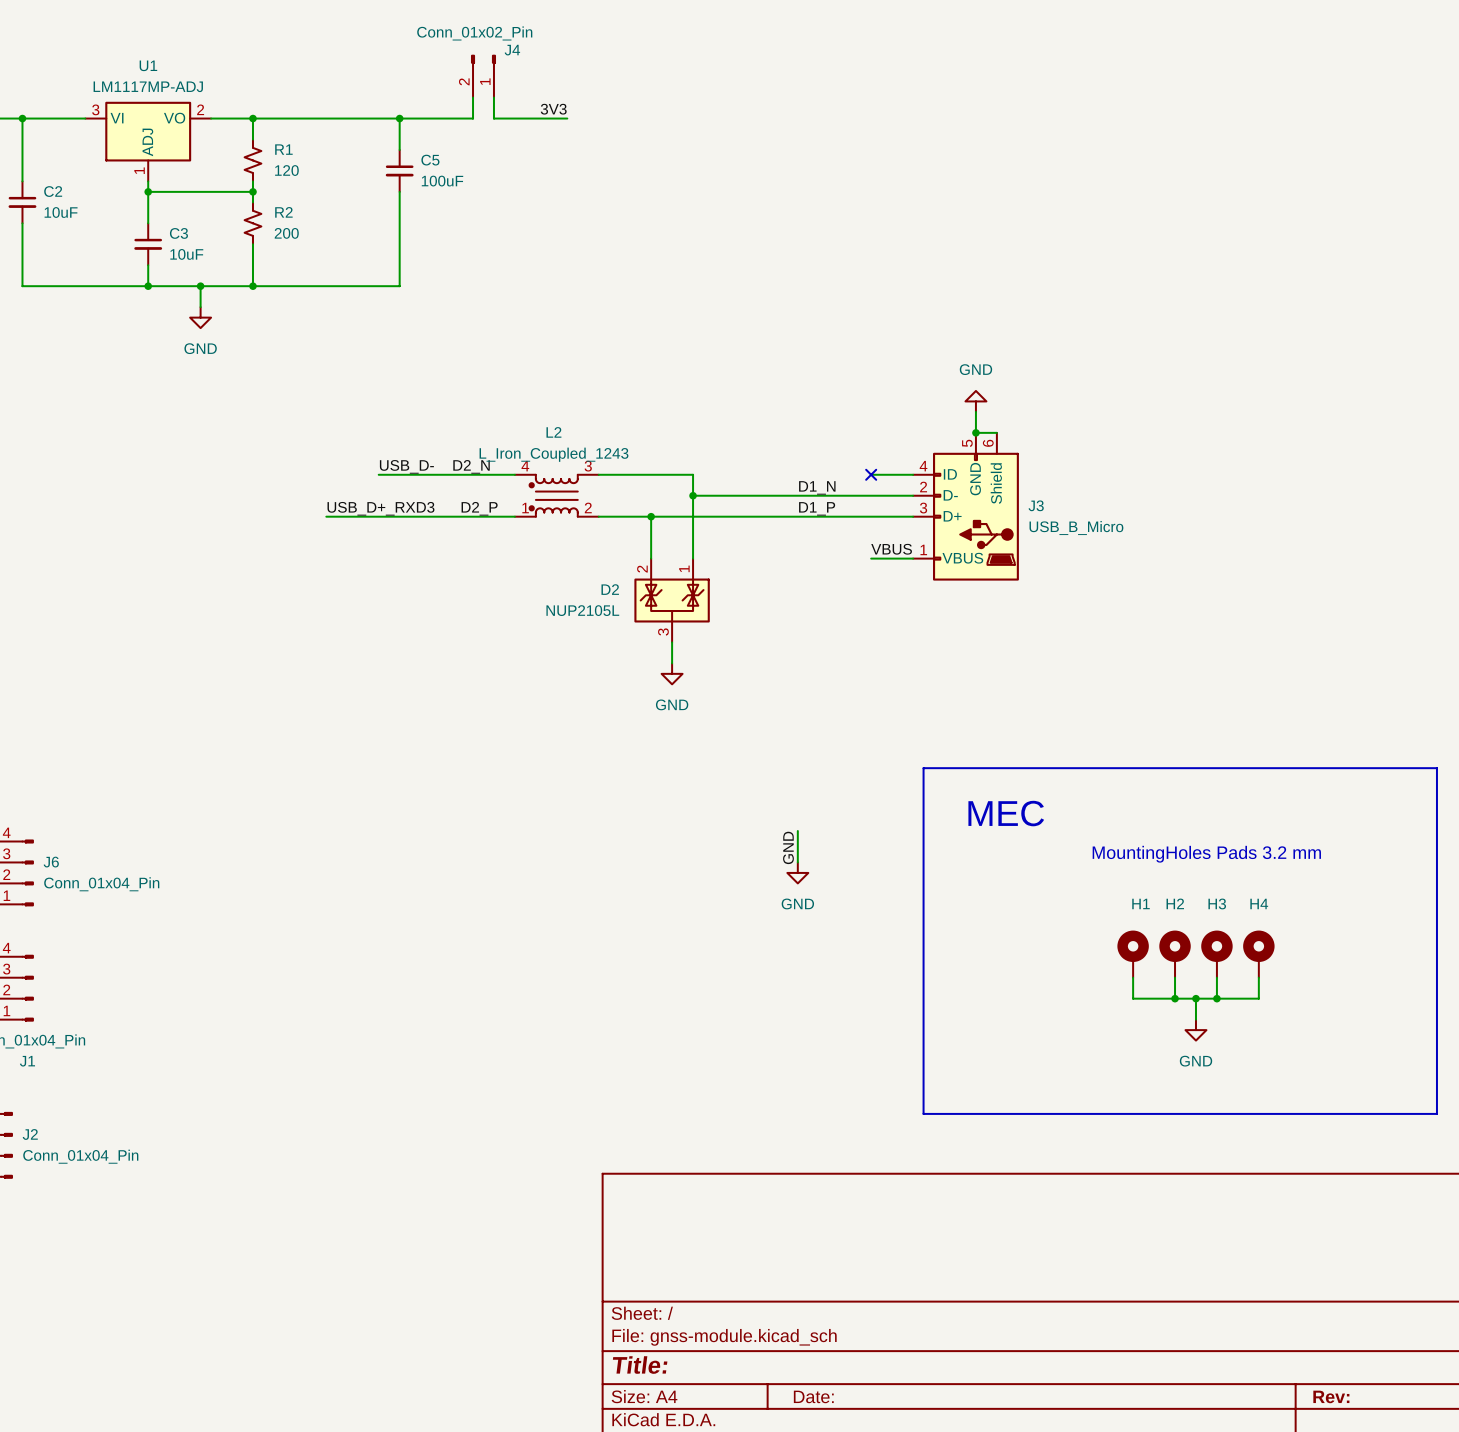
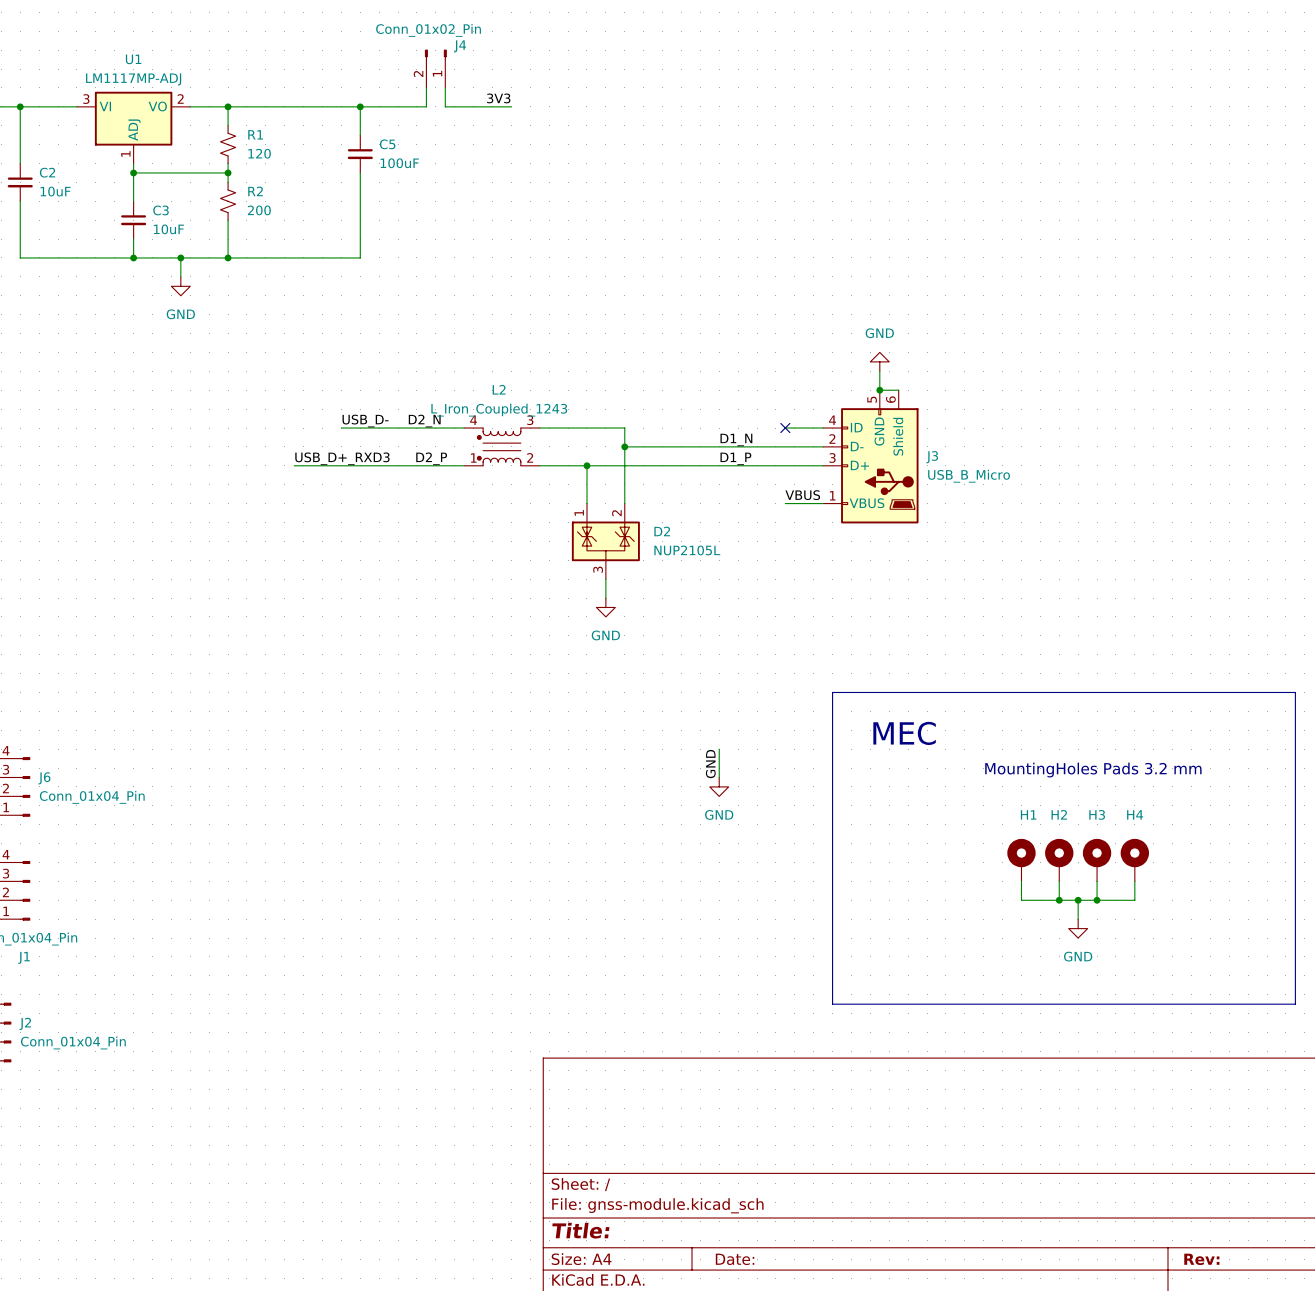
D2 flip: as is (672, 600) -> left-right (605, 541)

